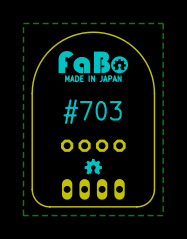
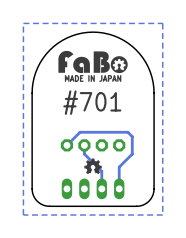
text: #703 (92, 111) -> #701 (92, 102)
track: none -> (66, 145) (80, 132) (127, 132) (132, 136) (132, 154) (119, 167) (119, 188)
track: none -> (84, 145) (84, 154) (101, 171) (101, 188)

